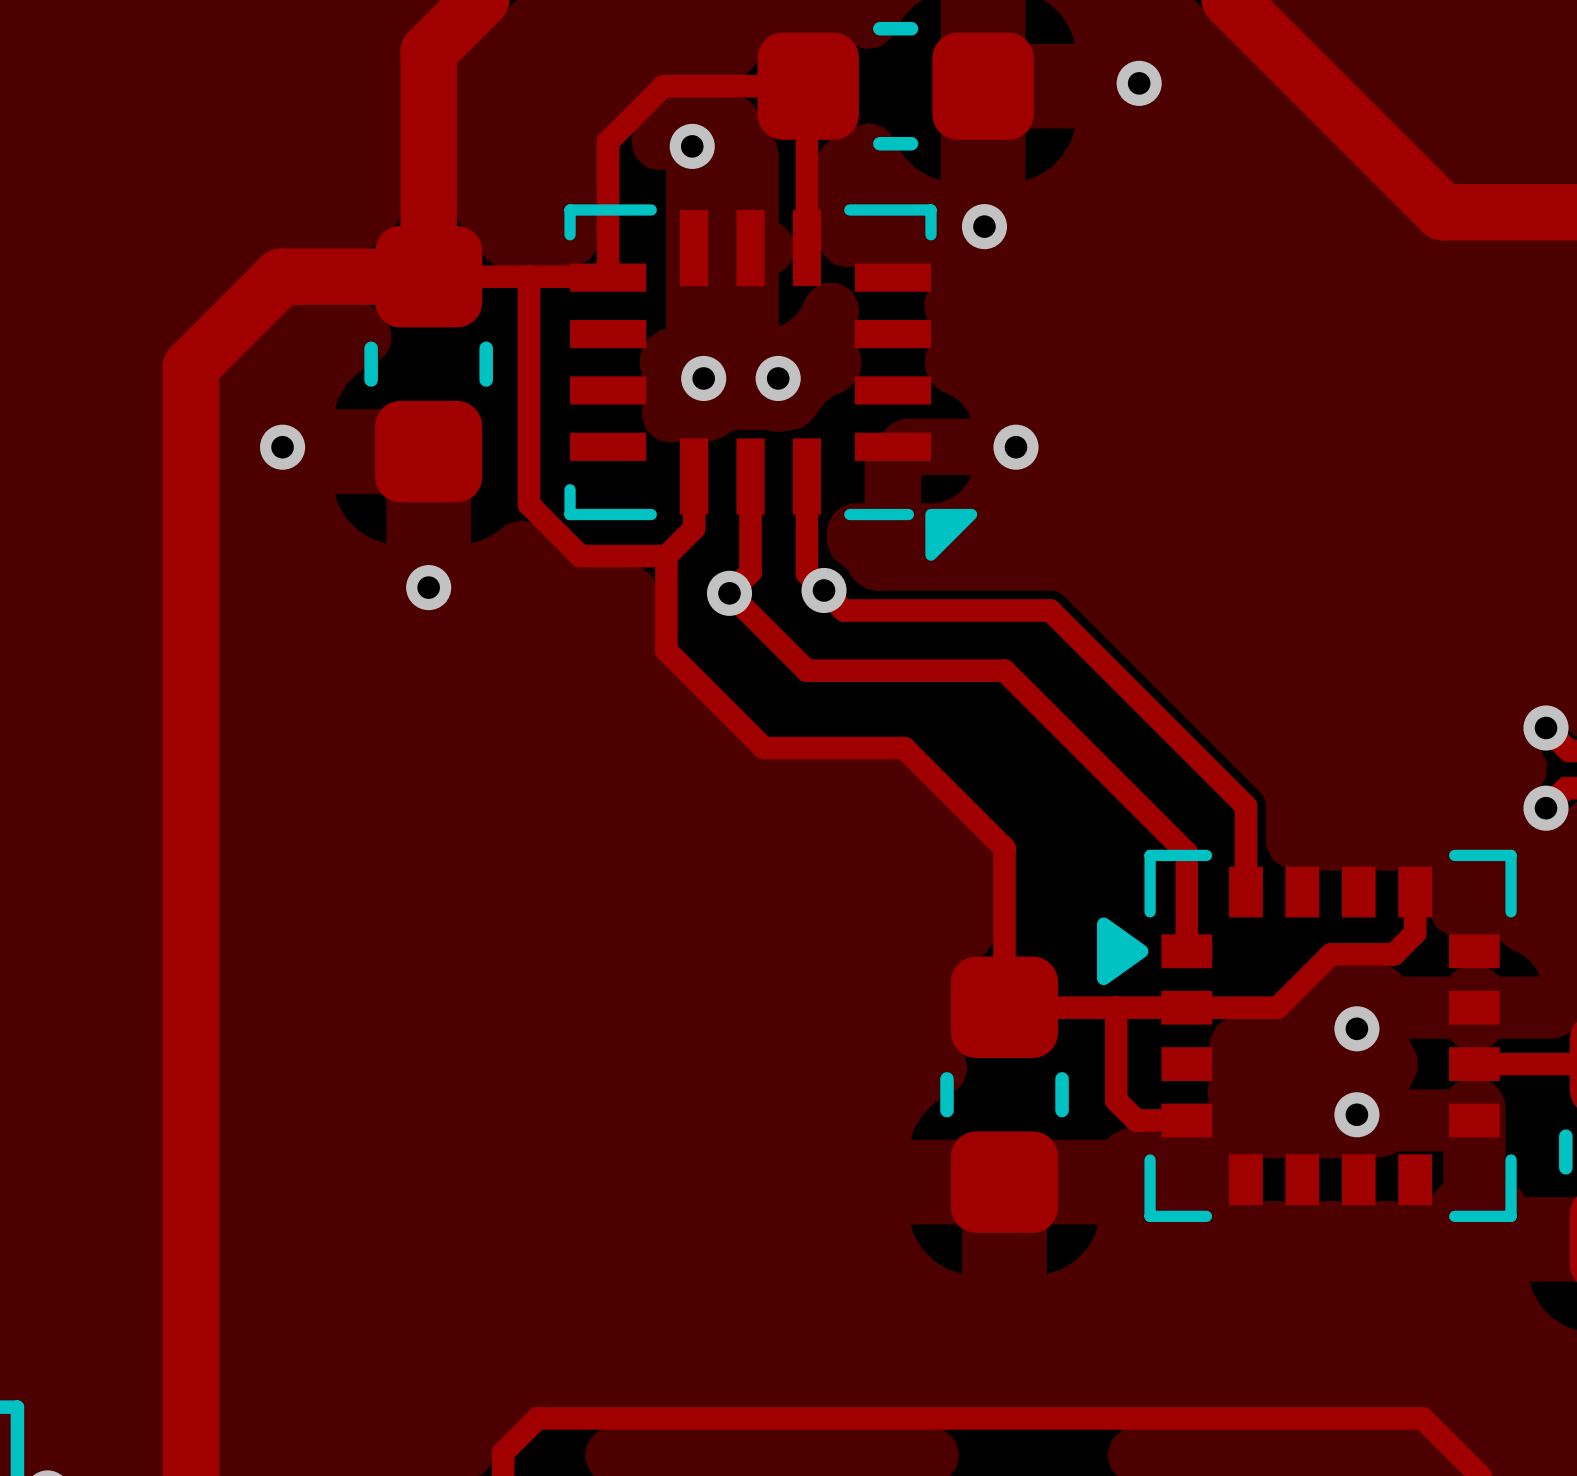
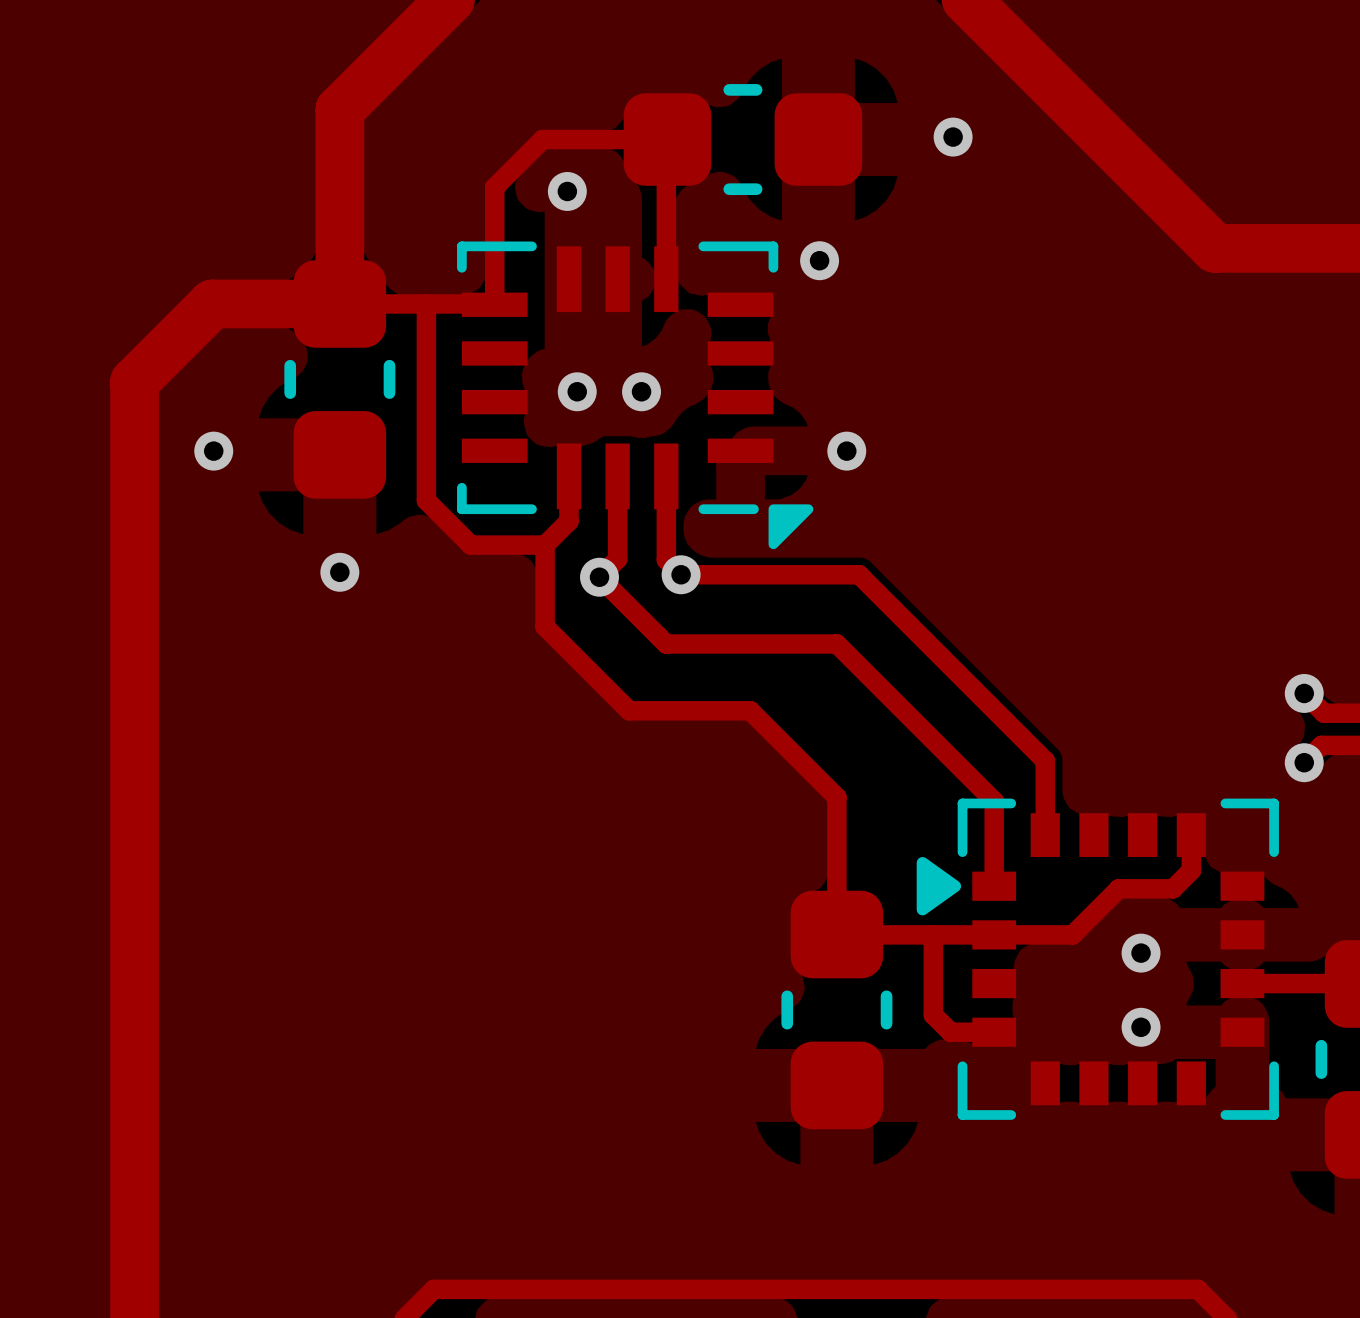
track: (824, 590) (844, 610) (1050, 610) -> (681, 574) (859, 574) (876, 592)

